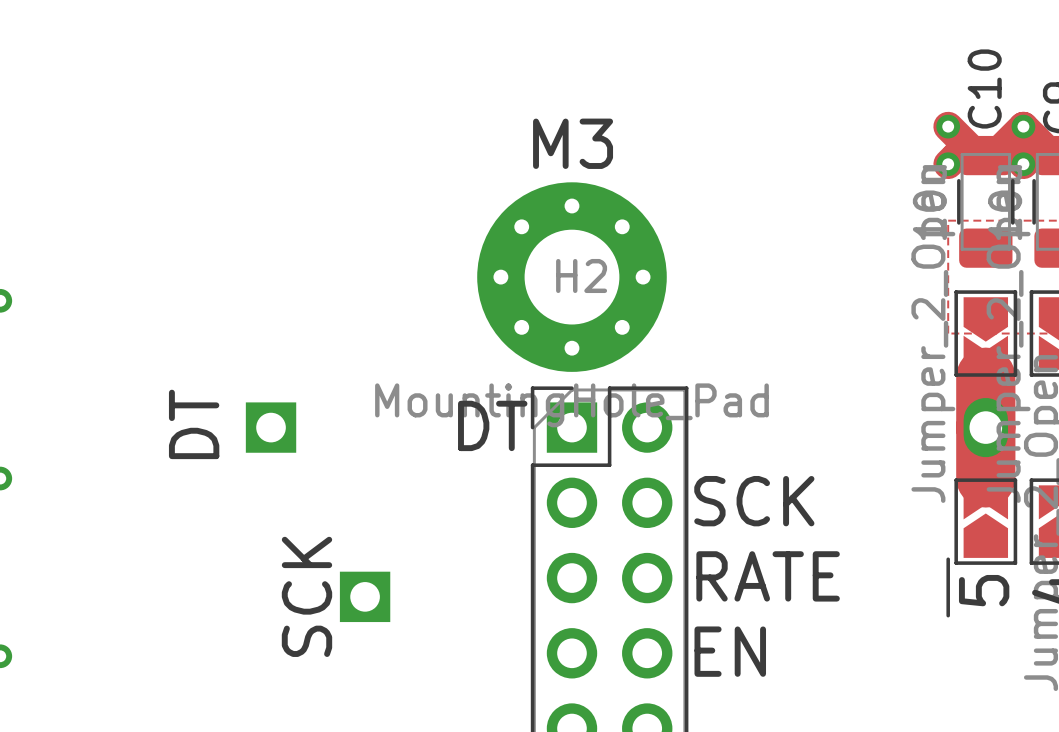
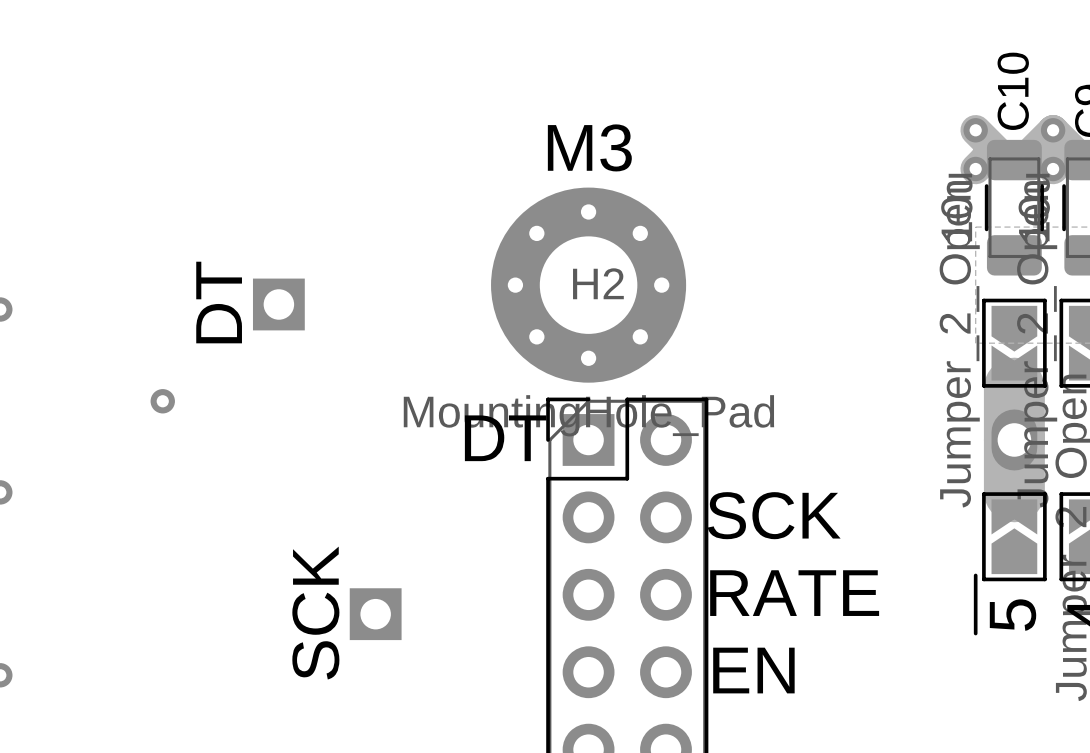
via: none -> (162, 401)
text position: DT (194, 424) -> DT (219, 302)
part position: (271, 427) -> (278, 304)

